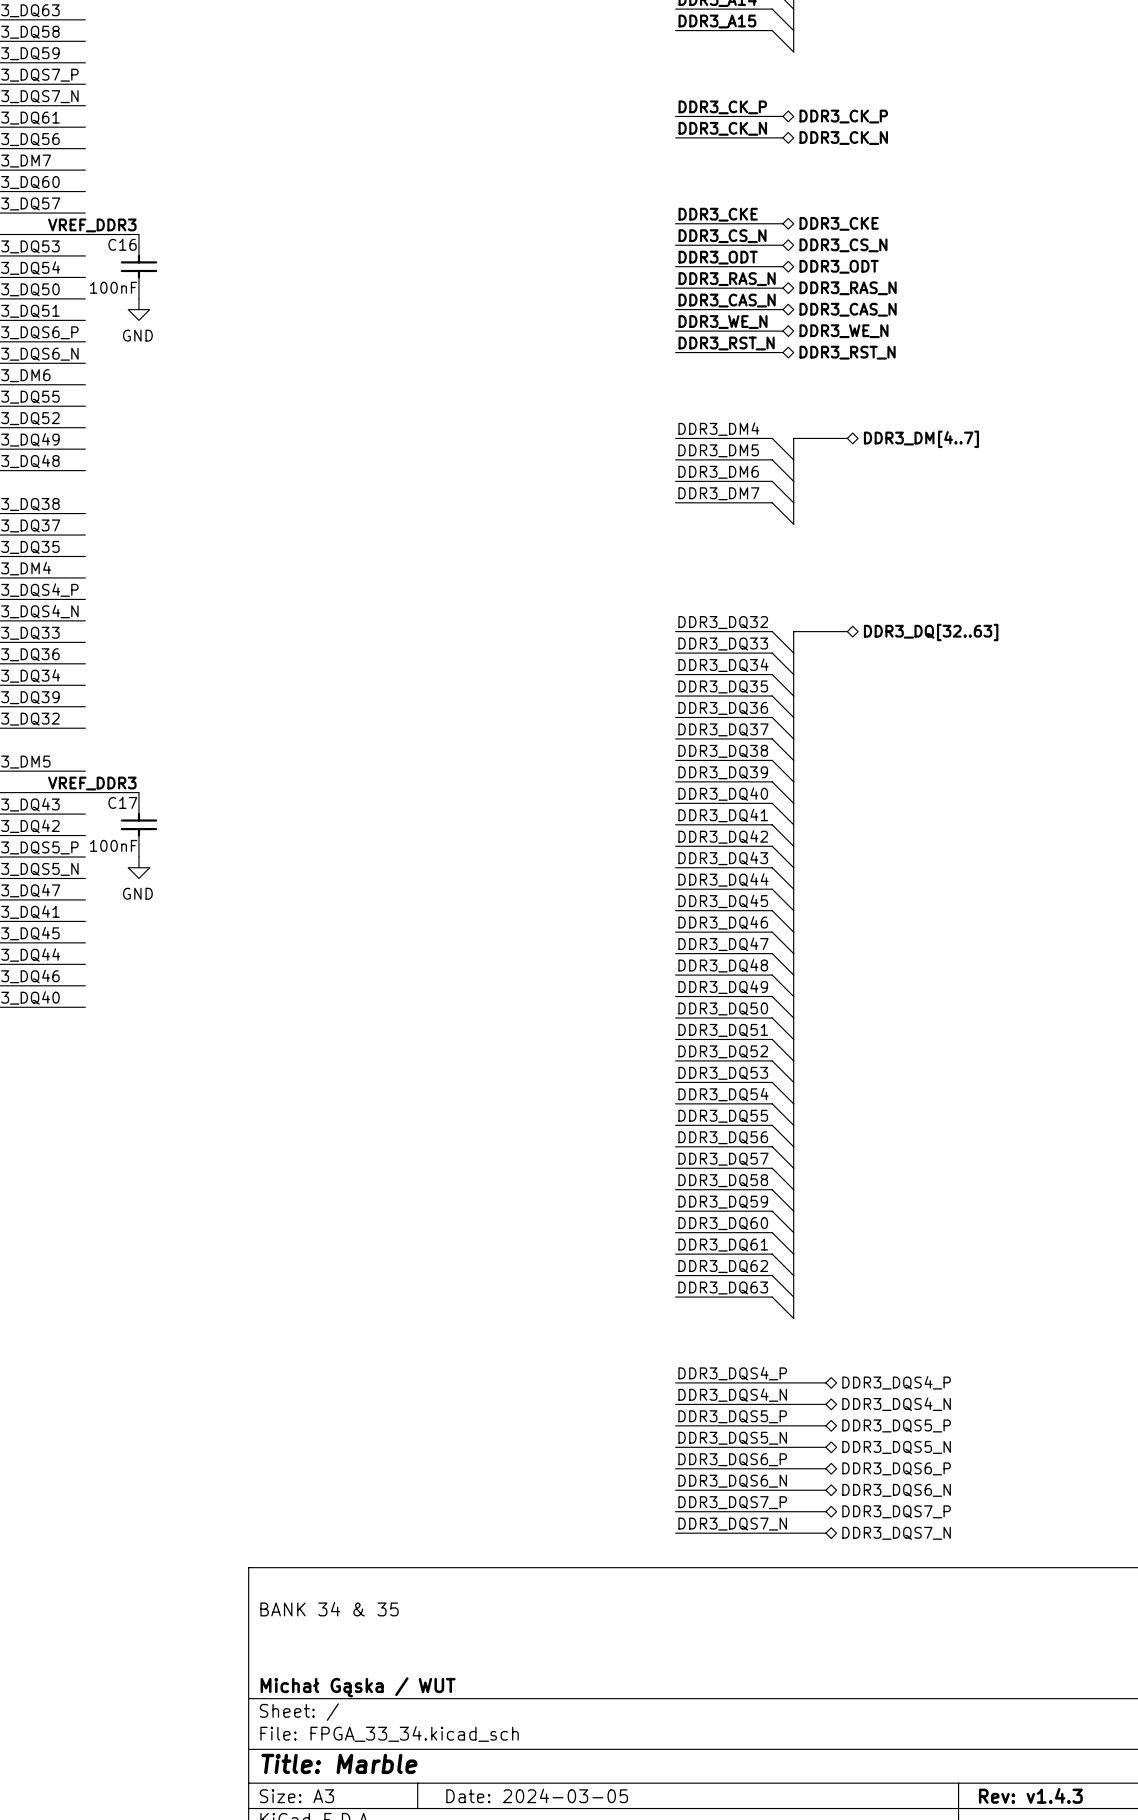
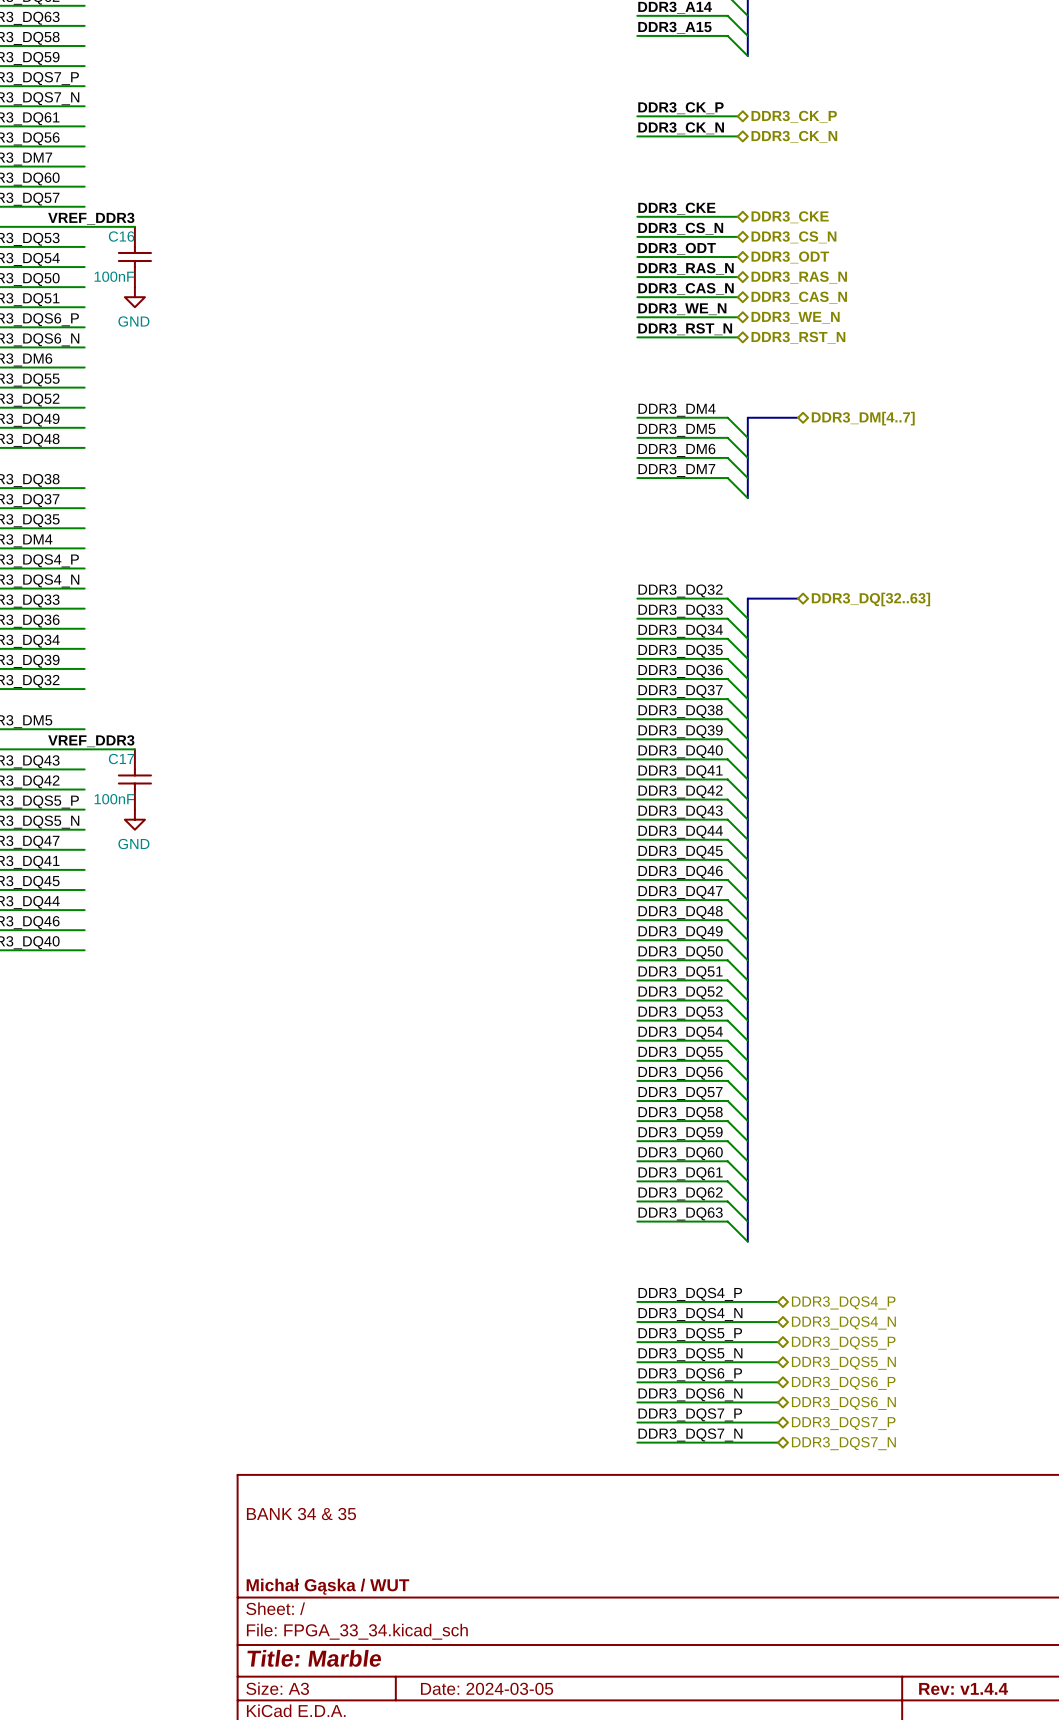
title block: Rev: v1.4.3 (1030, 1795) -> Rev: v1.4.4 (963, 1688)

